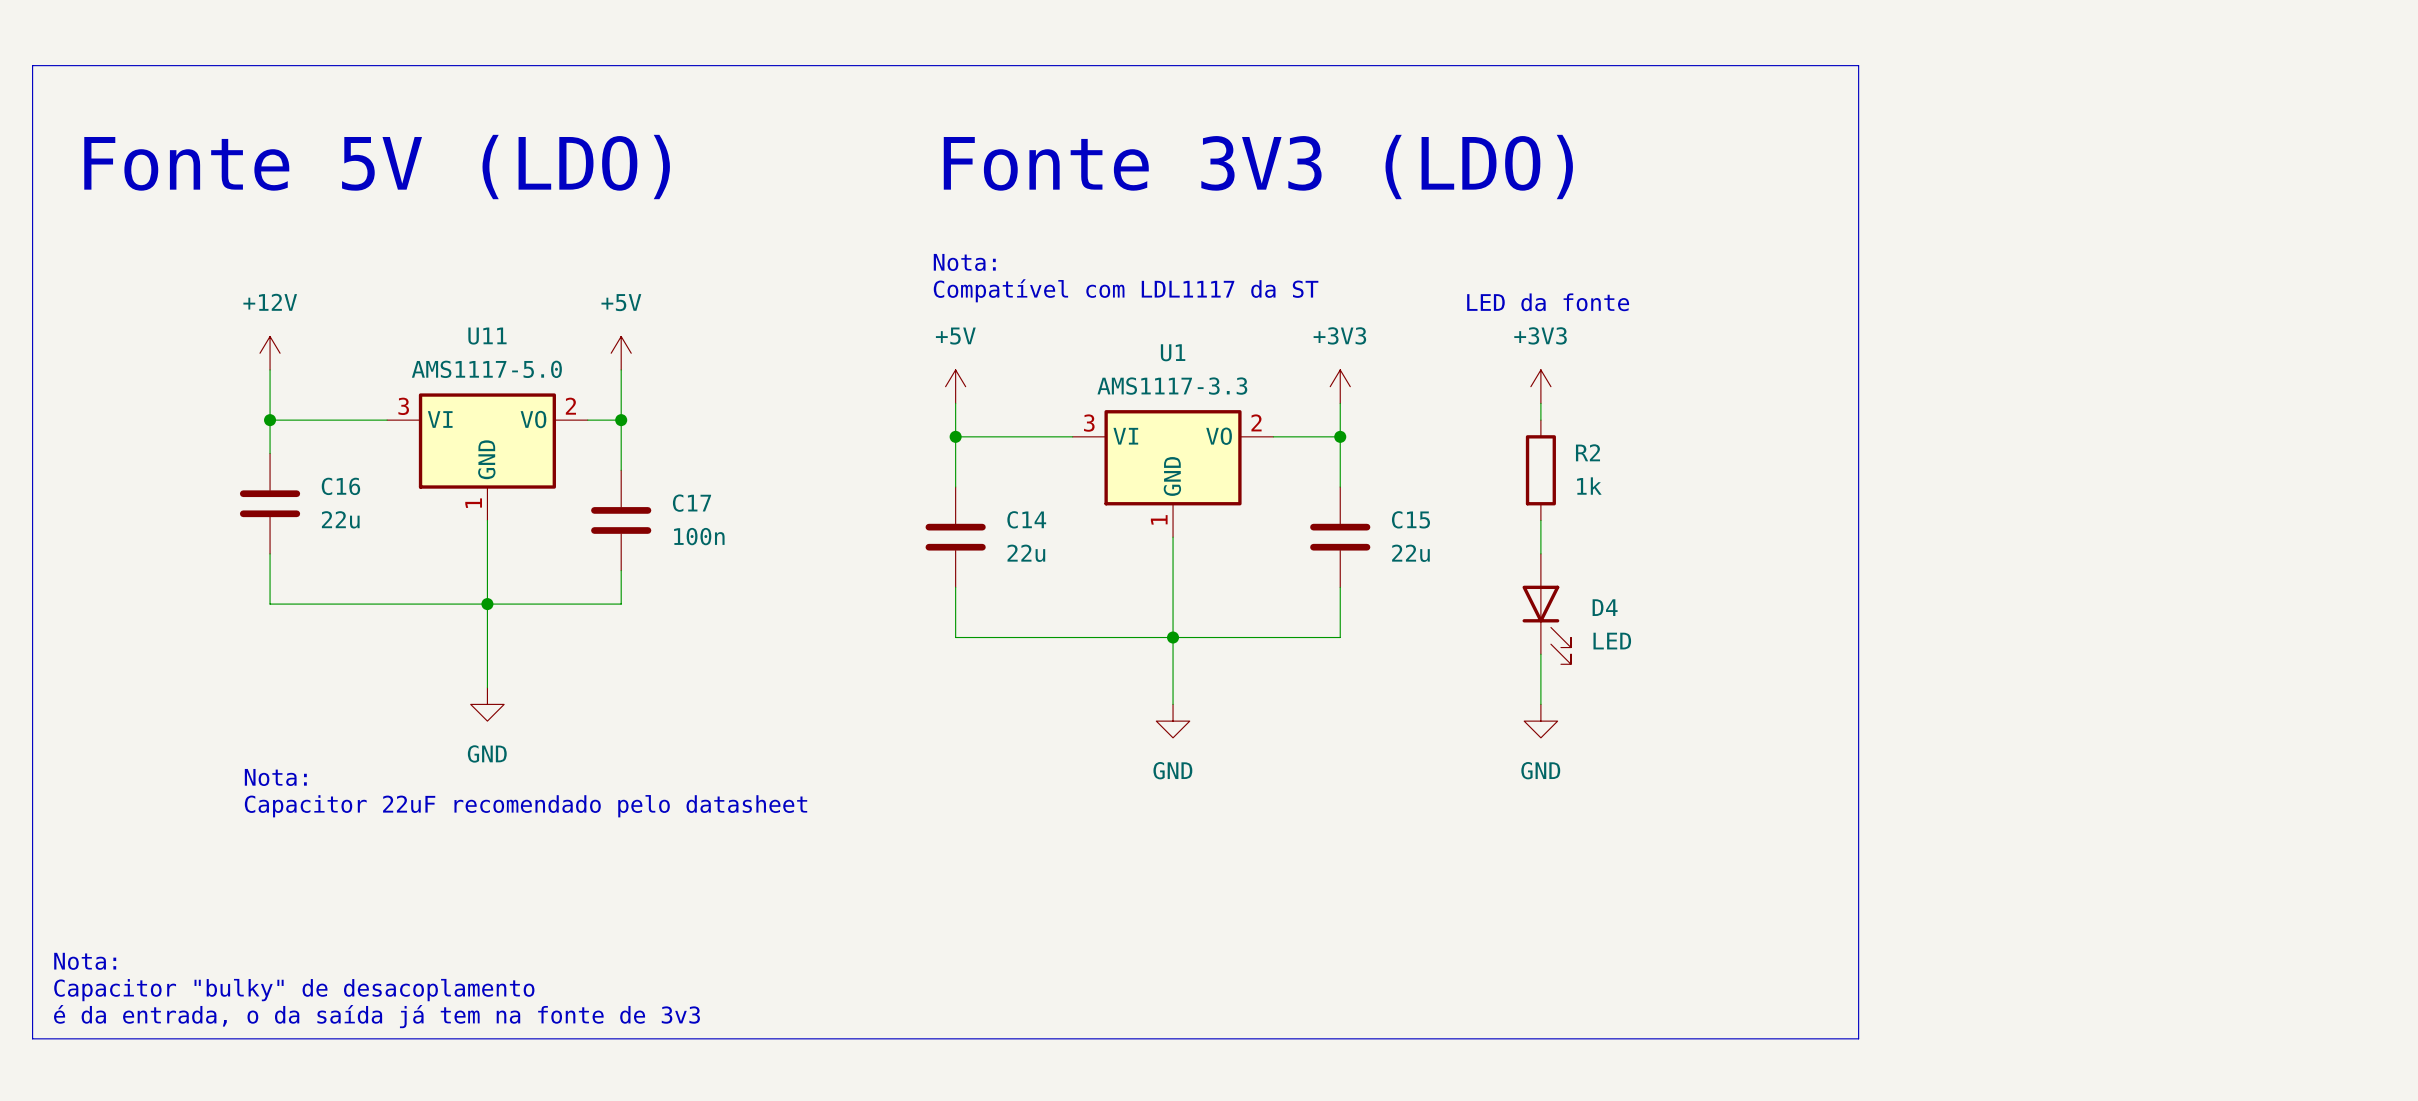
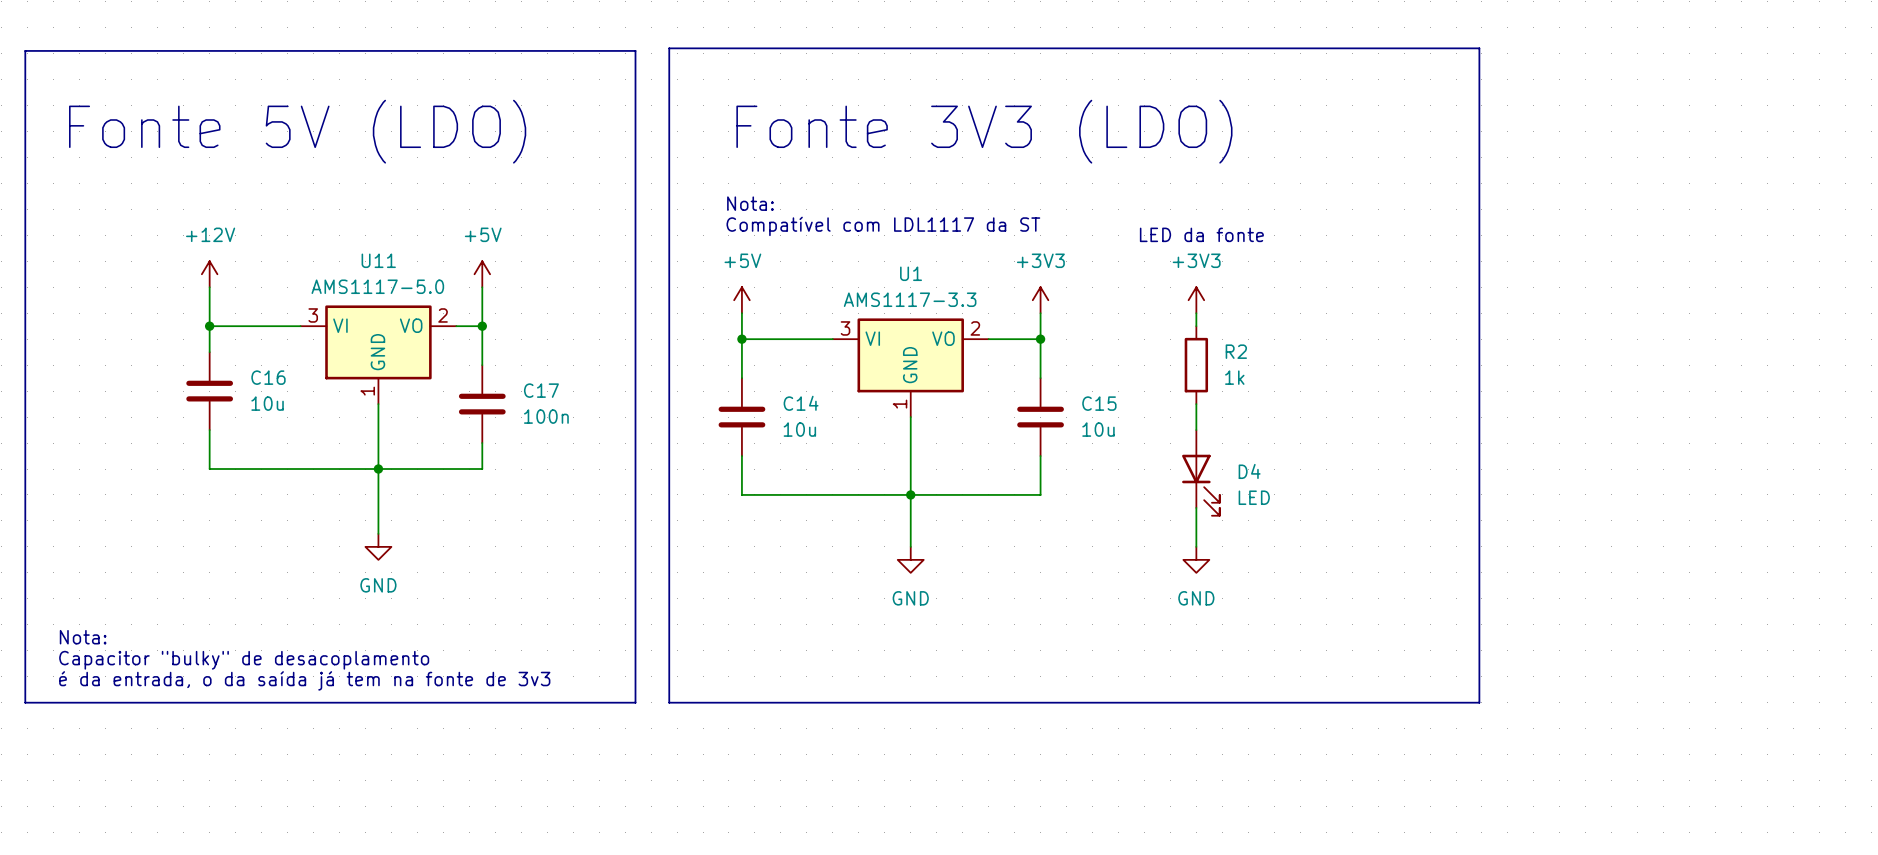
line: none -> (669, 48) (1479, 48) (1479, 702) (669, 702) (669, 48)
line: (818, 65) (1858, 65) (1858, 1038) (32, 1038) (32, 905) -> (635, 50) (635, 702) (25, 702)
C16 value: 22u (340, 519) -> 10u (267, 403)
C14 value: 22u (1026, 553) -> 10u (799, 429)
C15 value: 22u (1410, 553) -> 10u (1098, 429)
text: Nota: (275, 777) -> none
text: Capacitor 22uF recomendado pelo datasheet (526, 806) -> none
text: none -> Nota: (83, 637)
text: Nota: (85, 961) -> none
text position: Capacitor "bulky" de desacoplamento (294, 990) -> Capacitor "bulky" de desacoplamento (244, 660)
text position: é da entrada, o da saída já tem na fonte de 3v3 (376, 1016) -> é da entrada, o da saída já tem na fonte de 3v3 (304, 680)

